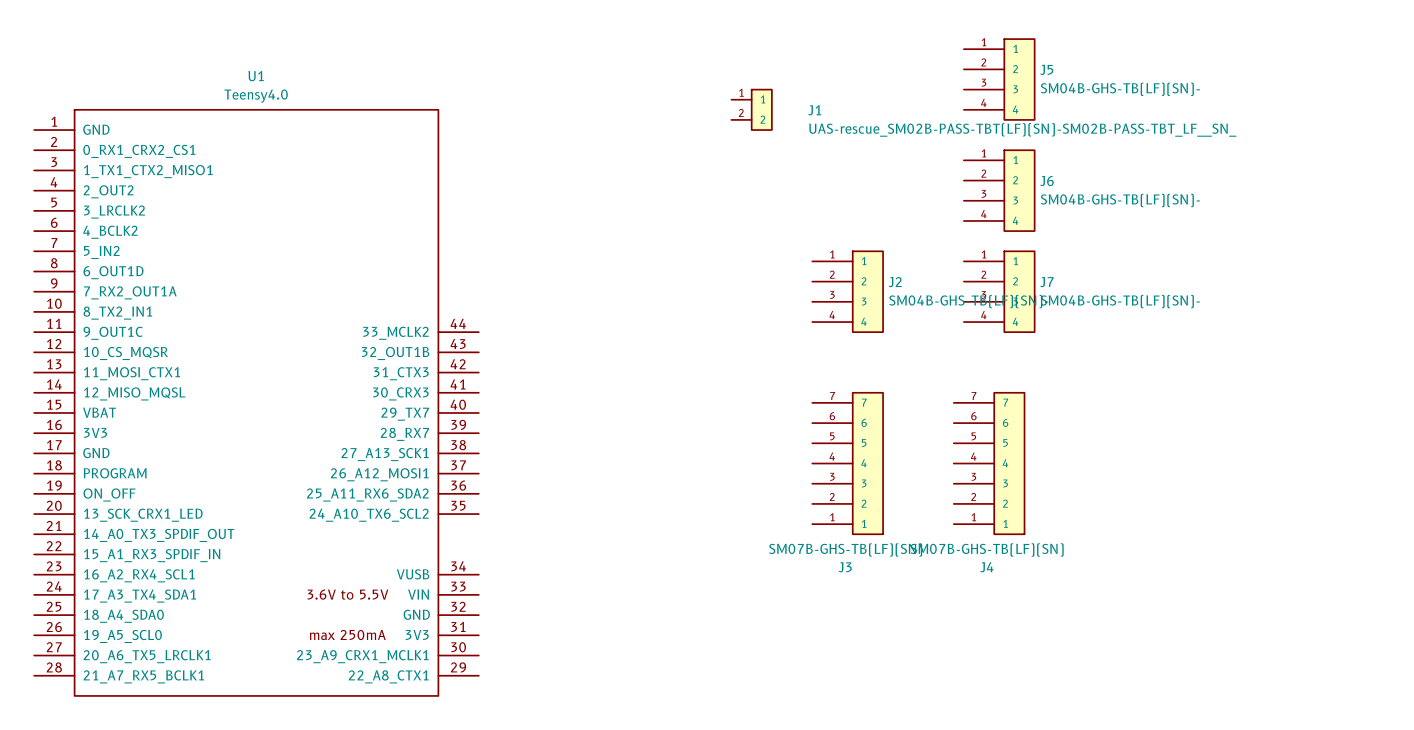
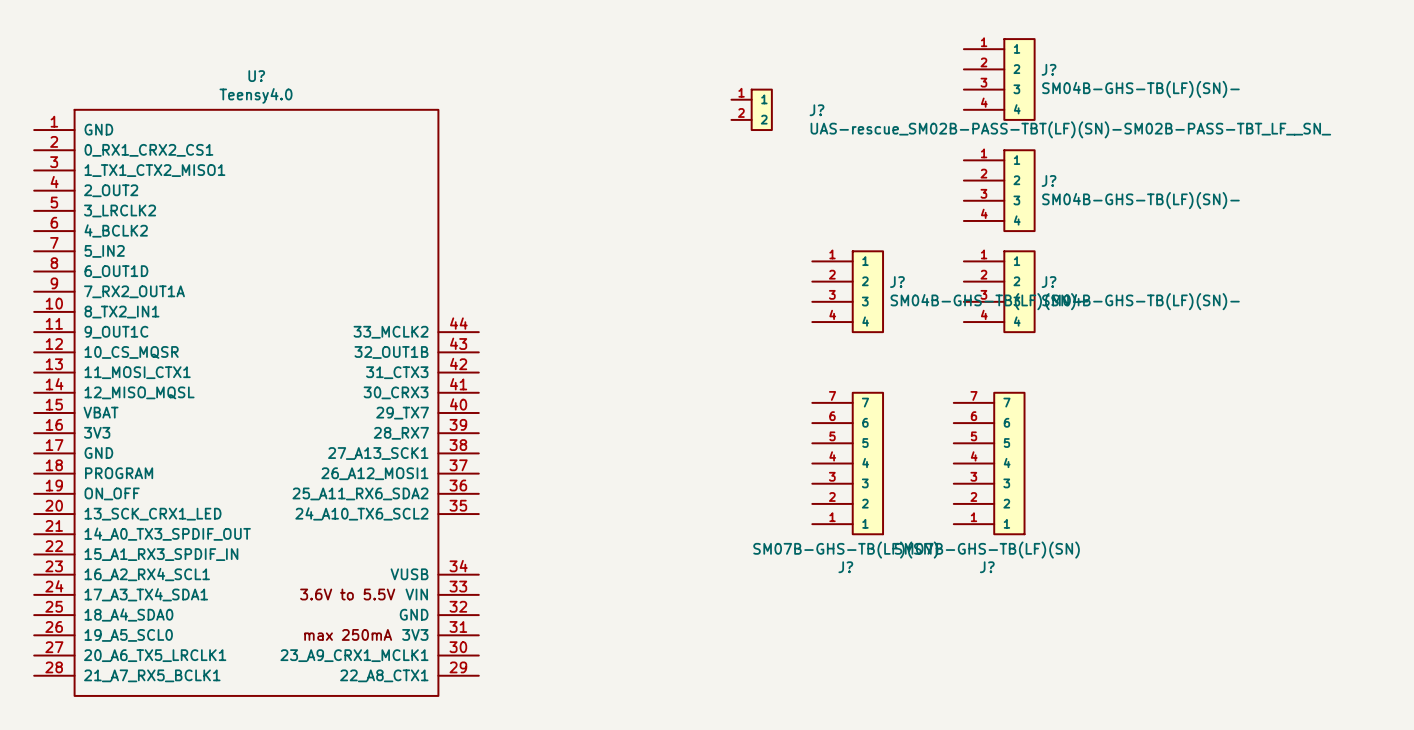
J5 name: J5 (1046, 69) -> J? (1049, 69)
U1 name: U1 (256, 76) -> U? (256, 76)
J1 name: J1 (814, 110) -> J? (817, 110)
J6 name: J6 (1047, 181) -> J? (1049, 180)
J2 name: J2 (895, 282) -> J? (897, 282)
J7 name: J7 (1046, 282) -> J? (1049, 282)
J3 name: J3 (845, 567) -> J? (845, 567)
J4 name: J4 (986, 567) -> J? (987, 567)

